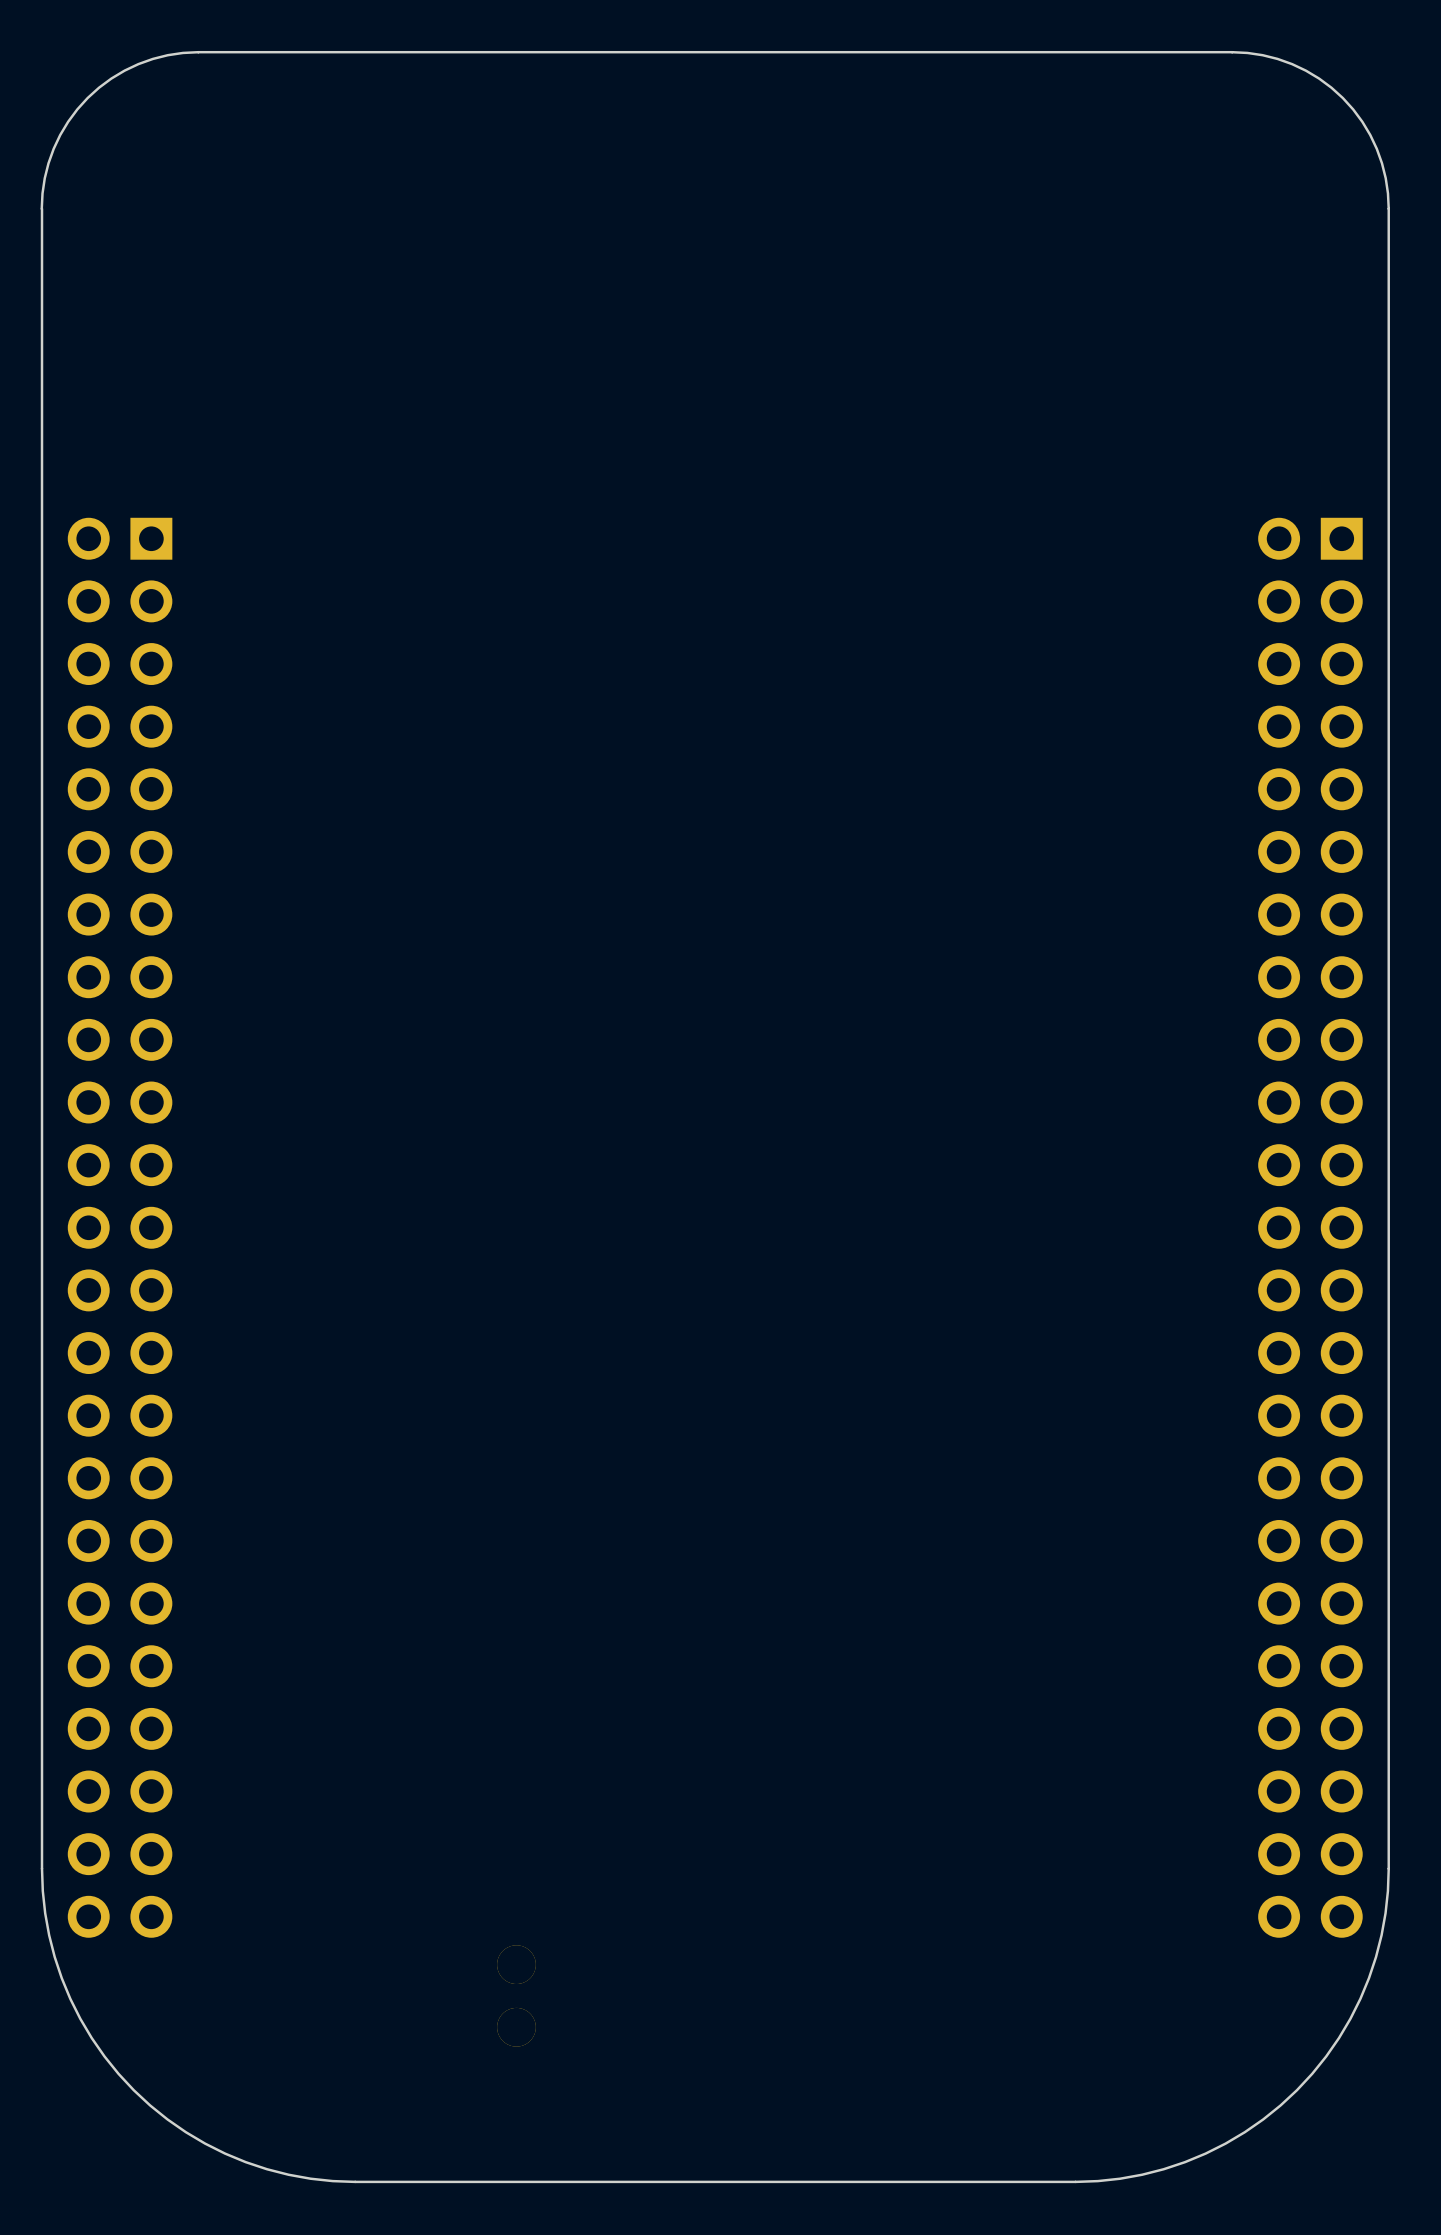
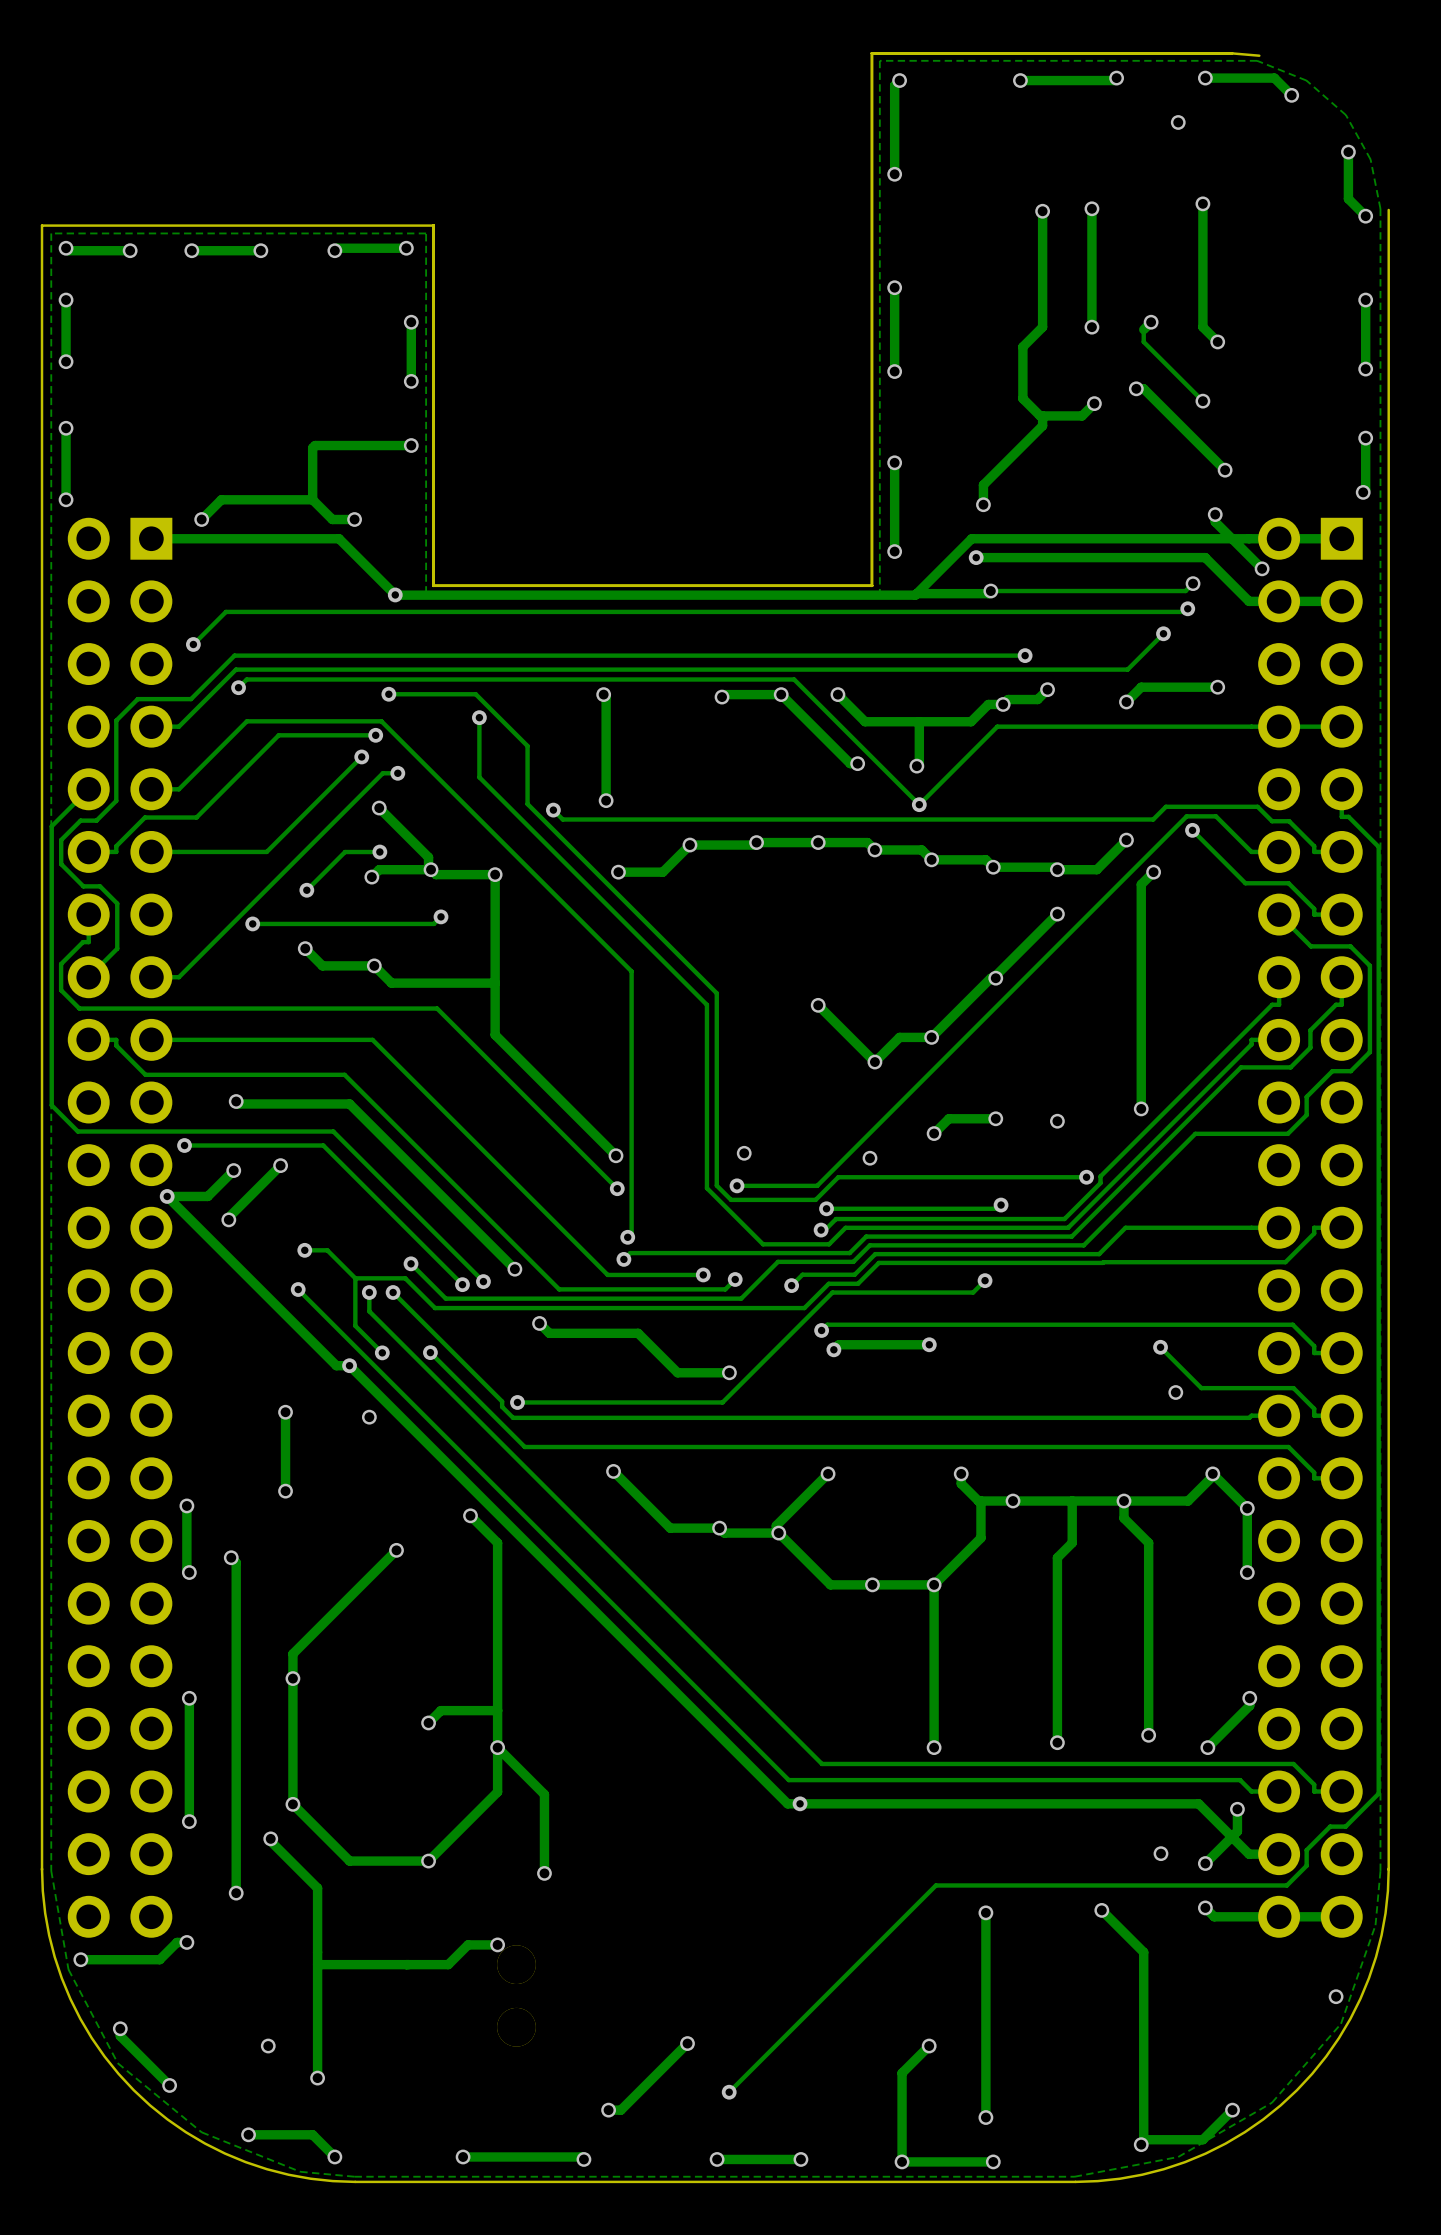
zone outline: none -> (1257, 60) (1306, 80) (1345, 115) (1370, 159) (1380, 208) (1380, 1870) (1375, 1925) (1341, 2023) (1271, 2102) (1178, 2156) (1074, 2176) (354, 2176) (300, 2171) (201, 2132) (117, 2063) (68, 1969) (51, 1870) (51, 233) (426, 233) (426, 593) (879, 593) (879, 60) (1257, 60)
track: none -> (1116, 78) (1114, 80) (1020, 80)
via: none -> (1116, 78)
track: none -> (1205, 78) (1274, 78) (1291, 95)
via: none -> (1205, 78)
track: none -> (899, 80) (894, 85) (894, 174)
via: none -> (899, 80)
via: none -> (1020, 80)
via: none -> (1291, 95)
via: none -> (1178, 122)
track: none -> (1348, 152) (1348, 198) (1365, 216)
via: none -> (1348, 152)
via: none -> (894, 174)
track: none -> (1202, 203) (1202, 327) (1217, 341)
via: none -> (1202, 203)
track: none -> (1091, 208) (1091, 327)
via: none -> (1091, 208)
board edge: (1388, 209) (1387, 193) (1381, 163) (1370, 134) (1353, 109) (1331, 87) (1305, 70) (1277, 58) (1247, 52) (198, 52) (183, 52) (152, 58) (124, 70) (99, 87) (77, 109) (60, 134) (48, 163) (42, 193) (42, 225) -> (1259, 55) (1232, 53) (871, 53) (871, 585) (433, 585) (433, 225) (41, 225)
track: none -> (1042, 211) (1042, 327) (1022, 346) (1022, 398) (1040, 415) (1082, 415) (1094, 403)
via: none -> (1042, 211)
via: none -> (1365, 216)
track: none -> (66, 248) (68, 250) (130, 250)
via: none -> (66, 248)
track: none -> (406, 248) (337, 248) (334, 250)
via: none -> (406, 248)
via: none -> (130, 250)
via: none -> (191, 250)
track: none -> (260, 250) (191, 250)
via: none -> (260, 250)
via: none -> (334, 250)
track: none -> (894, 287) (894, 371)
via: none -> (894, 287)
track: none -> (66, 300) (66, 361)
via: none -> (66, 300)
track: none -> (1365, 300) (1365, 369)
via: none -> (1365, 300)
track: none -> (411, 322) (411, 381)
via: none -> (411, 322)
track: none -> (1151, 322) (1143, 329) (1143, 341) (1202, 401)
via: none -> (1151, 322)
via: none -> (1091, 327)
via: none -> (1217, 341)
via: none -> (66, 361)
via: none -> (1365, 369)
via: none -> (894, 371)
via: none -> (411, 381)
track: none -> (1136, 388) (1143, 388) (1225, 470)
via: none -> (1136, 388)
via: none -> (1202, 401)
via: none -> (1094, 403)
track: none -> (1042, 415) (1042, 425) (983, 484) (983, 504)
track: none -> (66, 428) (66, 499)
via: none -> (66, 428)
track: none -> (1365, 438) (1365, 489) (1363, 492)
via: none -> (1365, 438)
track: none -> (411, 445) (315, 445) (312, 448) (312, 499)
via: none -> (411, 445)
track: none -> (894, 462) (894, 551)
via: none -> (894, 462)
via: none -> (1225, 470)
via: none -> (1363, 492)
via: none -> (66, 499)
track: none -> (312, 499) (332, 519) (354, 519)
track: none -> (312, 499) (221, 499) (201, 519)
via: none -> (983, 504)
track: none -> (1215, 514) (1215, 521) (1262, 568)
via: none -> (1215, 514)
via: none -> (201, 519)
via: none -> (354, 519)
track: none -> (1341, 538) (971, 538) (915, 595) (395, 595) (339, 538) (151, 538)
via: none -> (894, 551)
track: none -> (976, 557) (1205, 557) (1249, 601) (1341, 601)
via: none -> (976, 557)
via: none -> (1262, 568)
track: none -> (1193, 583) (1185, 591) (988, 591) (988, 593) (916, 593)
via: none -> (1193, 583)
via: none -> (990, 591)
via: none -> (395, 594)
track: none -> (1187, 608) (1184, 611) (225, 611) (193, 644)
via: none -> (1187, 608)
track: none -> (1163, 633) (1127, 669) (235, 669) (178, 726) (151, 726)
via: none -> (1163, 633)
via: none -> (193, 644)
track: none -> (1025, 655) (234, 655) (191, 699) (137, 699) (116, 720) (116, 800) (96, 820) (80, 820) (61, 840) (61, 864) (83, 886) (100, 886) (117, 903) (117, 948) (88, 977)
via: none -> (1025, 655)
track: none -> (238, 687) (246, 679) (794, 679) (919, 804) (997, 726) (1341, 726)
via: none -> (238, 687)
track: none -> (1217, 687) (1141, 687) (1126, 702)
via: none -> (1217, 687)
track: none -> (1047, 689) (1037, 699) (1008, 699) (1003, 704) (988, 704) (971, 721) (865, 721) (837, 694)
via: none -> (1047, 689)
track: none -> (388, 694) (475, 694) (527, 746) (527, 804) (716, 993) (716, 1185) (731, 1199) (815, 1199) (838, 1177) (1086, 1177)
via: none -> (388, 694)
track: none -> (603, 694) (606, 697) (606, 800)
via: none -> (603, 694)
via: none -> (781, 694)
via: none -> (837, 694)
track: none -> (722, 697) (724, 694) (781, 694) (850, 763) (857, 763)
via: none -> (722, 697)
via: none -> (1126, 702)
via: none -> (1003, 704)
track: none -> (479, 717) (479, 777) (706, 1004) (706, 1188) (763, 1244) (829, 1244) (845, 1227) (1068, 1227) (1251, 1044) (1251, 1039) (1279, 1039)
via: none -> (479, 717)
track: none -> (919, 721) (919, 763) (916, 766)
track: none -> (375, 735) (278, 735) (196, 817) (145, 817) (116, 846) (116, 851) (88, 851)
via: none -> (375, 735)
track: none -> (361, 756) (266, 851) (151, 851)
via: none -> (361, 756)
via: none -> (857, 763)
via: none -> (916, 766)
track: none -> (397, 773) (382, 773) (178, 977) (151, 977)
via: none -> (397, 773)
track: none -> (88, 789) (51, 826) (51, 1105) (77, 1131) (333, 1131) (483, 1281)
track: none -> (151, 789) (178, 789) (246, 721) (381, 721) (631, 971) (631, 1233) (627, 1237)
track: none -> (1341, 789) (1341, 816) (1348, 816) (1378, 846) (1378, 1793) (1345, 1826) (1330, 1826) (1306, 1850) (1306, 1865) (1286, 1885) (935, 1885) (729, 2092)
via: none -> (606, 800)
via: none -> (919, 804)
track: none -> (379, 808) (428, 857) (428, 869)
via: none -> (379, 808)
track: none -> (553, 810) (562, 819) (1153, 819) (1165, 806) (1257, 806) (1272, 821) (1289, 821) (1314, 846) (1314, 851) (1341, 851)
via: none -> (553, 810)
track: none -> (1192, 830) (1245, 883) (1288, 883) (1314, 908) (1314, 914) (1341, 914)
via: none -> (1192, 830)
track: none -> (1126, 840) (1096, 869) (993, 867) (985, 859) (931, 859) (921, 849) (874, 849) (867, 842) (756, 842) (754, 845) (689, 845) (662, 872) (618, 872)
via: none -> (1126, 840)
via: none -> (756, 842)
via: none -> (818, 842)
via: none -> (689, 845)
via: none -> (874, 849)
track: none -> (1279, 851) (1251, 851) (1215, 816) (1186, 816) (817, 1185) (737, 1185)
track: none -> (379, 852) (345, 852) (306, 890)
via: none -> (379, 852)
via: none -> (931, 859)
via: none -> (993, 867)
via: none -> (431, 869)
via: none -> (1057, 869)
via: none -> (618, 872)
track: none -> (1153, 872) (1141, 884) (1141, 1108)
via: none -> (1153, 872)
via: none -> (495, 874)
track: none -> (371, 877) (379, 869) (431, 869) (435, 874) (495, 874) (495, 1034) (615, 1155)
via: none -> (371, 877)
via: none -> (306, 890)
track: none -> (88, 914) (88, 942) (83, 942) (61, 964) (61, 990) (79, 1008) (437, 1008) (617, 1188)
track: none -> (1057, 914) (995, 975) (995, 978) (990, 978) (931, 1037) (899, 1037) (874, 1062) (818, 1005)
via: none -> (1057, 914)
track: none -> (1279, 914) (1310, 946) (1350, 946) (1369, 965) (1369, 1052) (1350, 1071) (1332, 1071) (1306, 1096) (1306, 1115) (1287, 1133) (1195, 1133) (1083, 1245) (869, 1245) (853, 1261) (778, 1261) (741, 1298) (445, 1298) (411, 1263)
track: none -> (441, 916) (433, 923) (252, 923)
via: none -> (441, 916)
via: none -> (252, 923)
track: none -> (305, 948) (322, 965) (374, 965) (391, 983) (495, 983)
via: none -> (305, 948)
via: none -> (374, 965)
track: none -> (1279, 977) (1279, 1004) (1272, 1004) (1100, 1176) (1100, 1183) (1064, 1219) (836, 1219) (825, 1230) (821, 1230)
track: none -> (1341, 977) (1341, 1004) (1336, 1004) (1310, 1030) (1310, 1047) (1290, 1067) (1240, 1067) (1071, 1236) (866, 1236) (849, 1253) (630, 1253) (623, 1259)
via: none -> (995, 978)
via: none -> (818, 1005)
via: none -> (931, 1037)
track: none -> (88, 1039) (116, 1039) (116, 1045) (145, 1074) (344, 1074) (559, 1289) (725, 1289) (735, 1279)
track: none -> (151, 1039) (372, 1039) (607, 1274) (703, 1274)
via: none -> (874, 1062)
track: none -> (236, 1101) (238, 1103) (349, 1103) (514, 1269)
via: none -> (236, 1101)
via: none -> (1141, 1108)
track: none -> (995, 1118) (948, 1118) (934, 1133)
via: none -> (995, 1118)
via: none -> (1057, 1121)
via: none -> (934, 1133)
track: none -> (184, 1145) (323, 1145) (462, 1284)
via: none -> (184, 1145)
via: none -> (744, 1153)
via: none -> (615, 1155)
via: none -> (869, 1158)
track: none -> (280, 1165) (228, 1217) (228, 1219)
via: none -> (280, 1165)
track: none -> (233, 1170) (207, 1196) (167, 1196) (336, 1365) (349, 1365) (787, 1803) (1198, 1803) (1249, 1854) (1279, 1854)
via: none -> (233, 1170)
via: none -> (1086, 1177)
via: none -> (737, 1185)
via: none -> (617, 1188)
via: none -> (167, 1196)
track: none -> (1001, 1205) (997, 1208) (826, 1208)
via: none -> (1001, 1205)
via: none -> (826, 1208)
via: none -> (228, 1219)
track: none -> (1279, 1227) (1125, 1227) (1099, 1254) (875, 1254) (854, 1274) (802, 1274) (791, 1285)
track: none -> (1341, 1227) (1314, 1227) (1314, 1233) (1285, 1262) (878, 1262) (858, 1283) (828, 1283) (804, 1308) (435, 1308) (405, 1278) (355, 1278)
via: none -> (821, 1230)
via: none -> (627, 1237)
track: none -> (304, 1250) (327, 1250) (355, 1278)
via: none -> (304, 1250)
via: none -> (623, 1259)
via: none -> (411, 1263)
via: none -> (514, 1269)
via: none -> (703, 1274)
track: none -> (355, 1278) (355, 1325) (382, 1352)
via: none -> (735, 1279)
track: none -> (985, 1280) (973, 1292) (832, 1292) (722, 1402) (517, 1402)
via: none -> (985, 1280)
via: none -> (483, 1281)
via: none -> (462, 1284)
via: none -> (791, 1285)
track: none -> (298, 1289) (788, 1780) (1240, 1780) (1251, 1791) (1279, 1791)
via: none -> (298, 1289)
track: none -> (369, 1292) (369, 1311) (821, 1763) (1293, 1763) (1314, 1784) (1314, 1791) (1341, 1791)
via: none -> (369, 1292)
track: none -> (393, 1292) (502, 1401) (502, 1406) (513, 1417) (1249, 1417) (1251, 1415) (1279, 1415)
via: none -> (393, 1292)
track: none -> (539, 1323) (549, 1333) (638, 1333) (677, 1372) (729, 1372)
via: none -> (539, 1323)
track: none -> (821, 1330) (827, 1324) (1292, 1324) (1314, 1346) (1314, 1353) (1341, 1353)
via: none -> (821, 1330)
track: none -> (929, 1344) (838, 1344) (833, 1349)
via: none -> (929, 1344)
track: none -> (1160, 1347) (1201, 1388) (1293, 1388) (1314, 1408) (1314, 1415) (1341, 1415)
via: none -> (1160, 1347)
via: none -> (833, 1349)
via: none -> (382, 1352)
track: none -> (430, 1352) (524, 1447) (1288, 1447) (1314, 1472) (1314, 1478) (1341, 1478)
via: none -> (430, 1352)
via: none -> (349, 1365)
via: none -> (729, 1372)
via: none -> (1175, 1392)
via: none -> (517, 1402)
track: none -> (285, 1412) (285, 1491)
via: none -> (285, 1412)
via: none -> (369, 1417)
track: none -> (613, 1471) (670, 1528) (719, 1528) (724, 1533) (778, 1533) (830, 1584) (934, 1584)
via: none -> (613, 1471)
track: none -> (828, 1473) (776, 1525) (776, 1533)
via: none -> (828, 1473)
track: none -> (961, 1473) (961, 1483) (978, 1501) (1188, 1501) (1212, 1476) (1212, 1473) (1247, 1508) (1247, 1572)
via: none -> (961, 1473)
via: none -> (1212, 1473)
via: none -> (285, 1491)
track: none -> (980, 1501) (980, 1538) (934, 1584)
via: none -> (1013, 1501)
track: none -> (1072, 1501) (1072, 1542) (1057, 1557) (1057, 1742)
track: none -> (1124, 1501) (1124, 1518) (1148, 1542) (1148, 1735)
via: none -> (1124, 1501)
track: none -> (186, 1505) (186, 1570) (189, 1572)
via: none -> (186, 1505)
via: none -> (1247, 1508)
track: none -> (470, 1515) (497, 1542) (497, 1792) (428, 1861) (349, 1861) (292, 1804) (292, 1653) (396, 1550)
via: none -> (470, 1515)
via: none -> (719, 1528)
via: none -> (778, 1533)
via: none -> (396, 1550)
track: none -> (231, 1557) (236, 1562) (236, 1893)
via: none -> (231, 1557)
via: none -> (189, 1572)
via: none -> (1247, 1572)
via: none -> (872, 1584)
track: none -> (934, 1584) (934, 1747)
via: none -> (934, 1584)
via: none -> (292, 1678)
track: none -> (189, 1698) (189, 1821)
via: none -> (189, 1698)
track: none -> (1249, 1698) (1249, 1705) (1207, 1747)
via: none -> (1249, 1698)
track: none -> (497, 1710) (440, 1710) (428, 1722)
via: none -> (428, 1722)
via: none -> (1148, 1735)
via: none -> (1057, 1742)
track: none -> (497, 1747) (544, 1794) (544, 1873)
via: none -> (497, 1747)
via: none -> (934, 1747)
via: none -> (1207, 1747)
via: none -> (800, 1803)
via: none -> (292, 1804)
track: none -> (1237, 1809) (1237, 1831) (1205, 1863)
via: none -> (1237, 1809)
via: none -> (189, 1821)
track: none -> (270, 1838) (270, 1841) (317, 1888) (317, 2078)
via: none -> (270, 1838)
via: none -> (1160, 1853)
via: none -> (428, 1861)
via: none -> (1205, 1863)
via: none -> (544, 1873)
via: none -> (236, 1893)
track: none -> (1205, 1907) (1214, 1916) (1341, 1916)
via: none -> (1205, 1907)
track: none -> (1101, 1910) (1143, 1952) (1143, 2142)
via: none -> (1101, 1910)
track: none -> (985, 1912) (985, 2117)
via: none -> (985, 1912)
track: none -> (186, 1942) (177, 1942) (159, 1959) (80, 1959)
via: none -> (186, 1942)
track: none -> (497, 1944) (468, 1944) (448, 1964) (317, 1964)
via: none -> (497, 1944)
via: none -> (80, 1959)
via: none -> (1336, 1996)
track: none -> (120, 2028) (120, 2036) (169, 2085)
via: none -> (120, 2028)
track: none -> (687, 2043) (620, 2110) (608, 2110)
via: none -> (687, 2043)
via: none -> (268, 2046)
track: none -> (929, 2046) (902, 2073) (902, 2161) (993, 2161)
via: none -> (929, 2046)
via: none -> (317, 2078)
via: none -> (169, 2085)
via: none -> (729, 2092)
via: none -> (608, 2110)
track: none -> (1232, 2110) (1202, 2139) (1146, 2139) (1141, 2144)
via: none -> (1232, 2110)
via: none -> (985, 2117)
track: none -> (248, 2134) (312, 2134) (334, 2156)
via: none -> (248, 2134)
via: none -> (1141, 2144)
via: none -> (334, 2156)
track: none -> (463, 2156) (581, 2156) (583, 2159)
via: none -> (463, 2156)
via: none -> (583, 2159)
via: none -> (717, 2159)
track: none -> (800, 2159) (717, 2159)
via: none -> (800, 2159)
via: none -> (902, 2161)
via: none -> (993, 2161)

